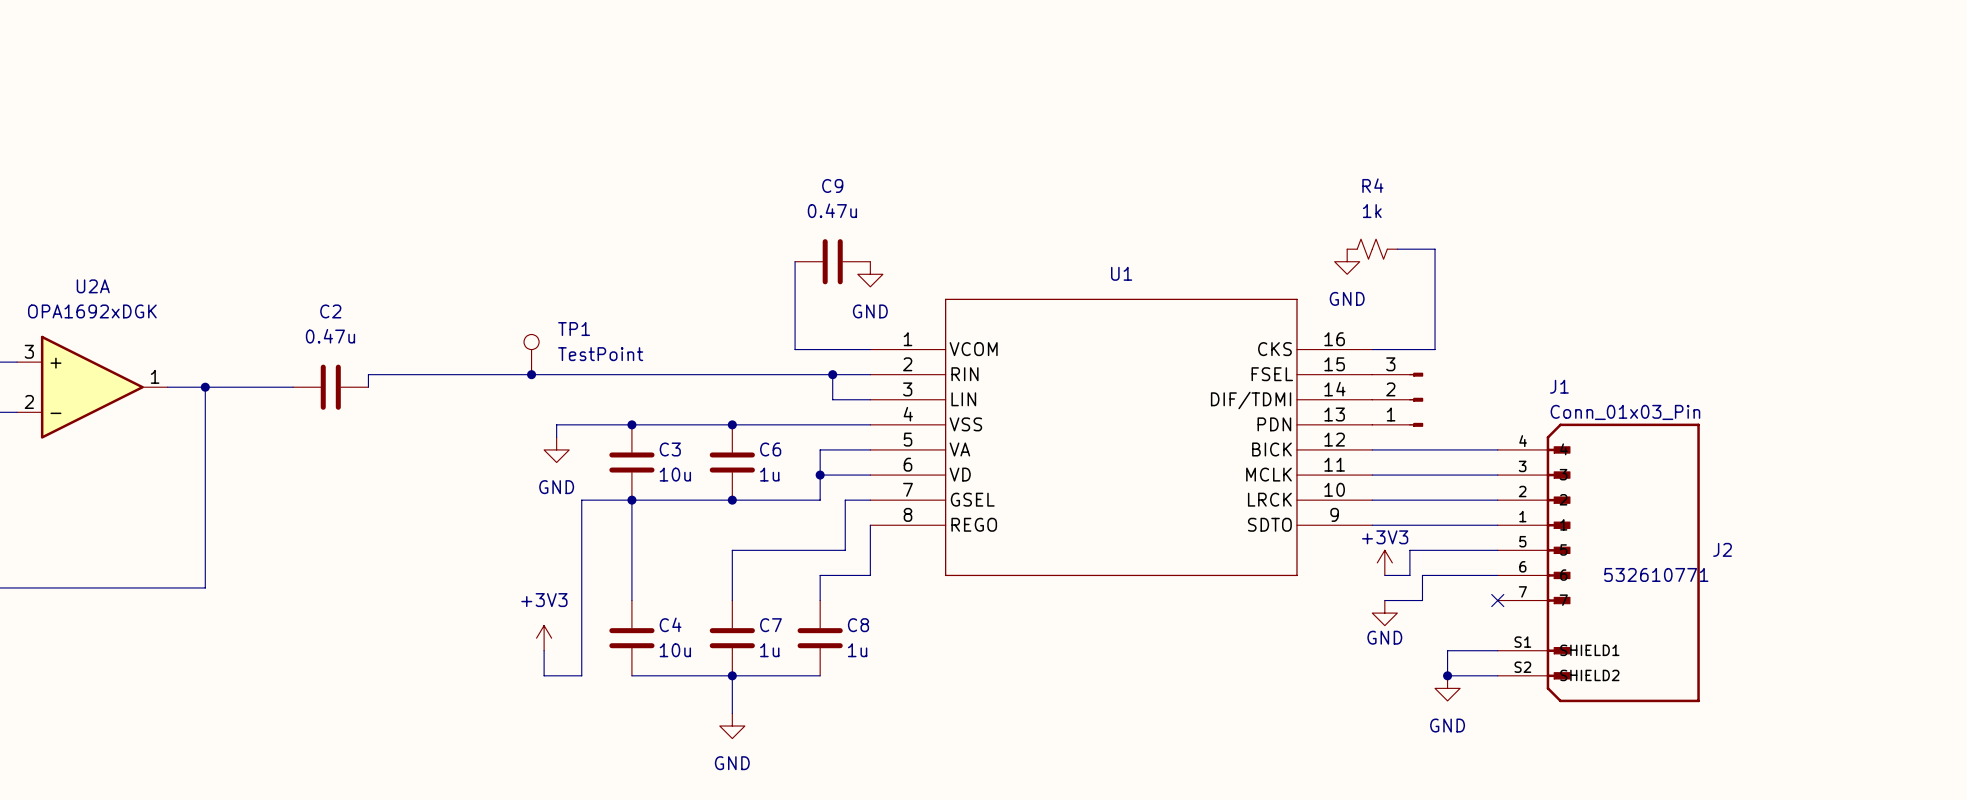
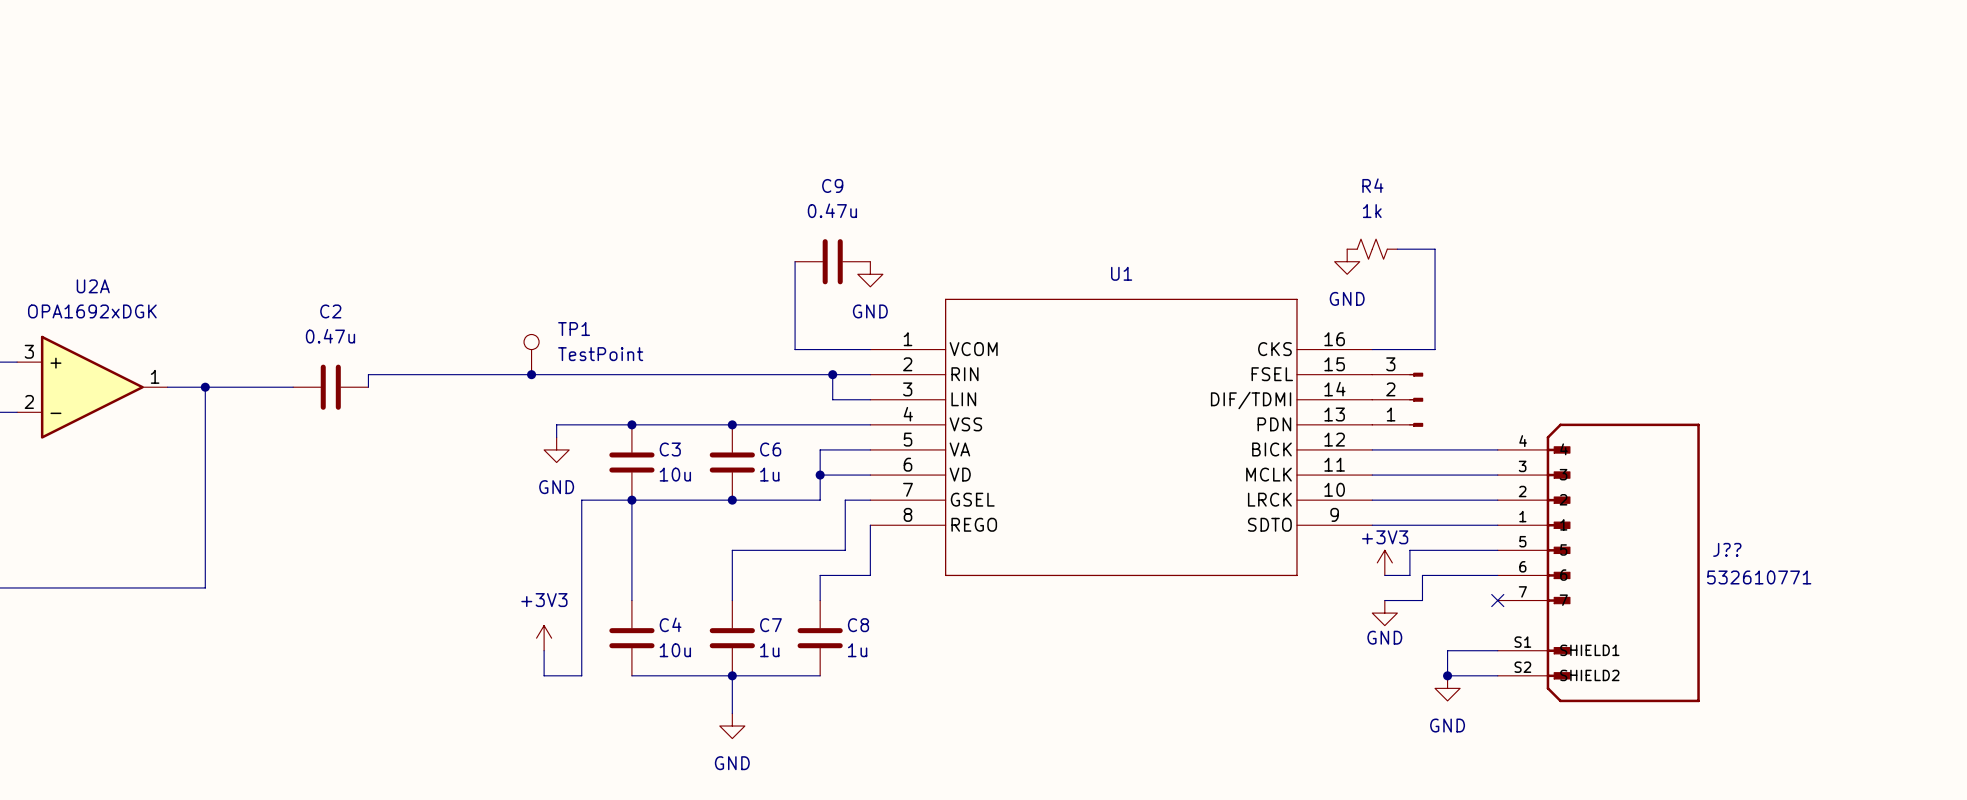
J1 name: J1 (1559, 386) -> none
J1 value: Conn_01x03_Pin (1625, 412) -> none
J2 name: J2 (1722, 549) -> J?? (1727, 549)
J2 value position: 532610771 (1656, 574) -> 532610771 (1759, 577)

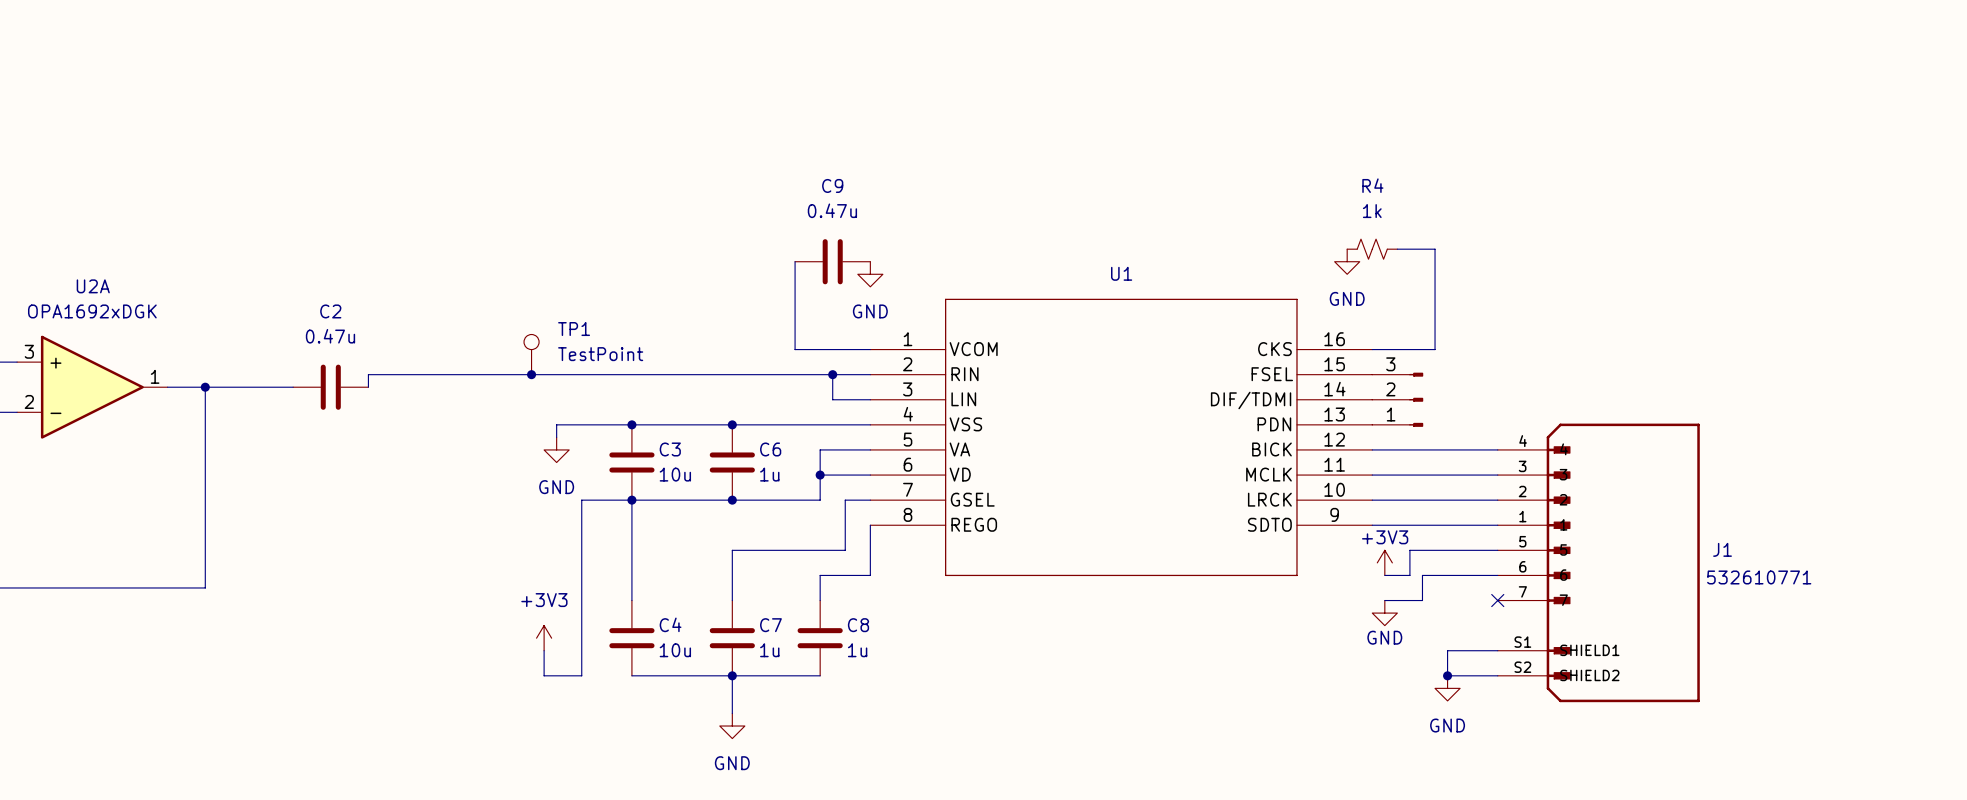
J?? name: J?? (1727, 549) -> J1 (1722, 549)

